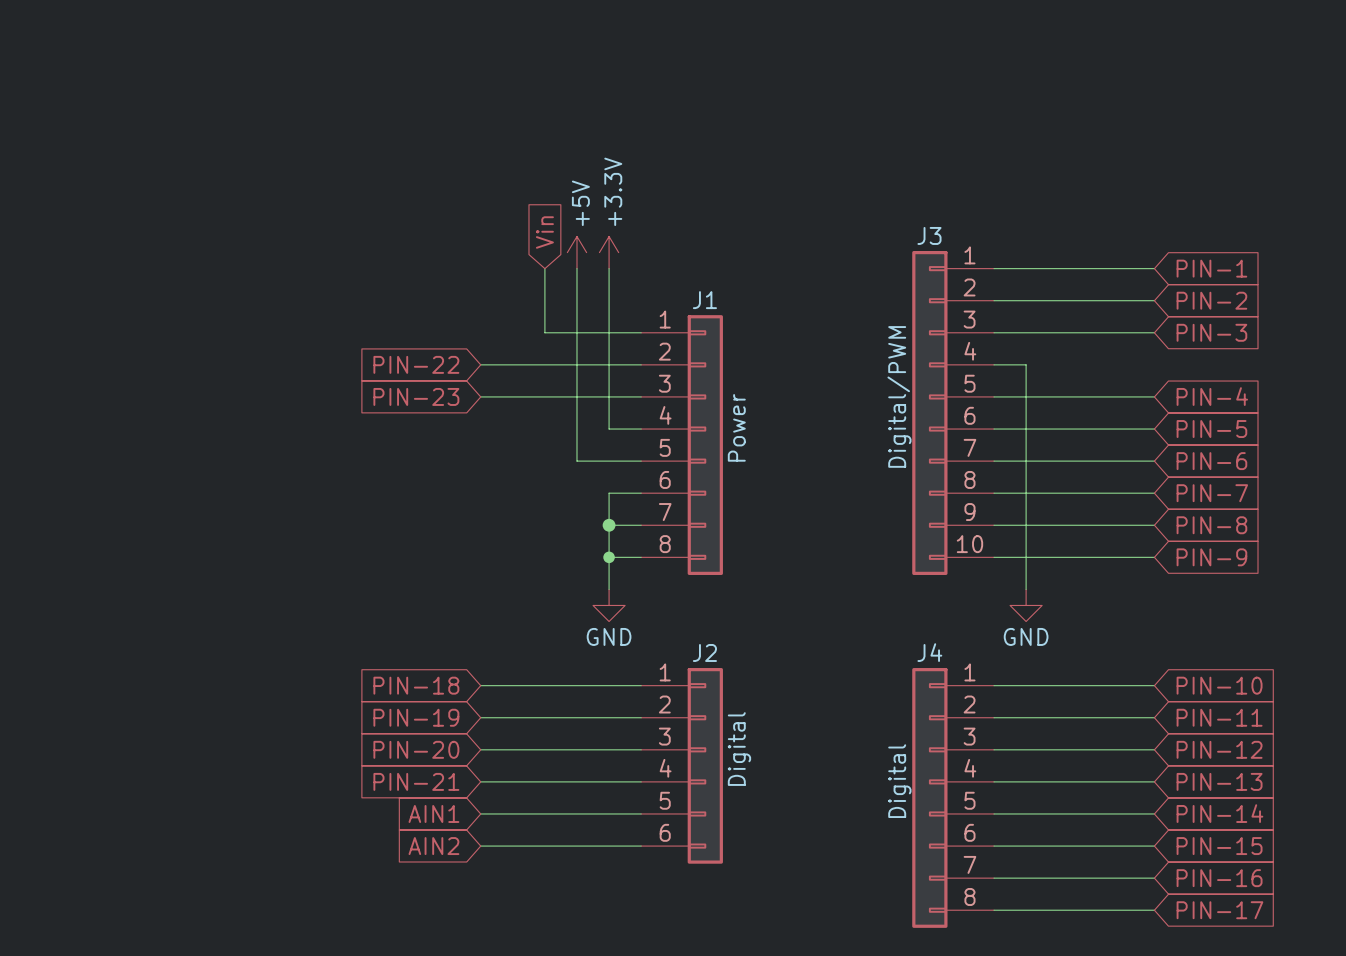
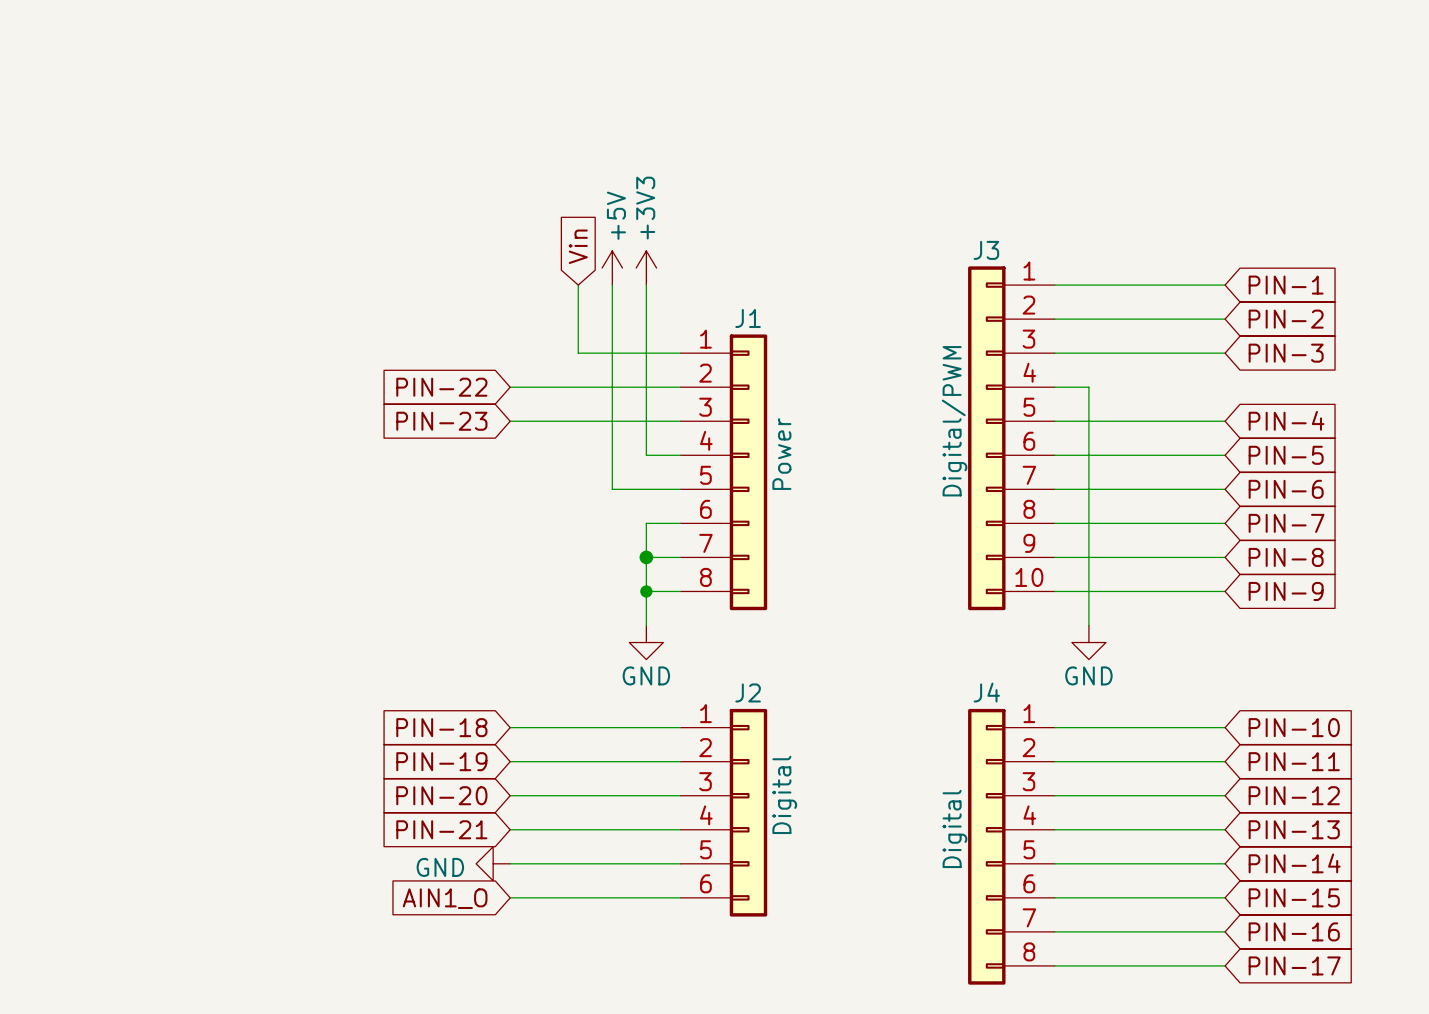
power symbol: +3.3V (609, 252) -> +3V3 (646, 268)
global label: AIN1 (433, 813) -> none
power symbol: none -> GND (493, 863)
global label: AIN2 (433, 846) -> AIN1_O (445, 898)

